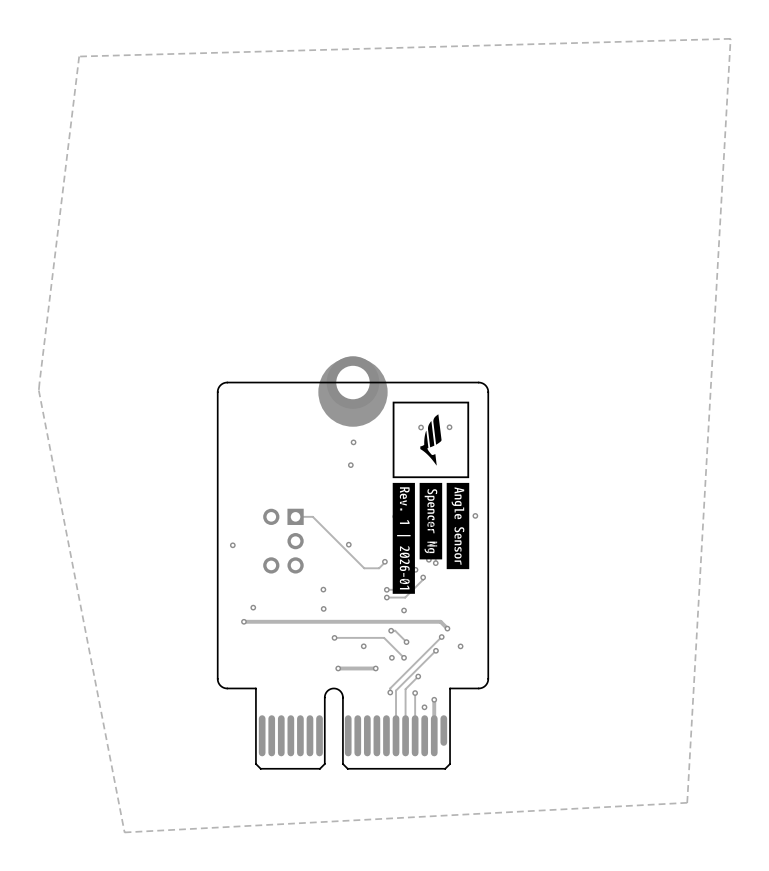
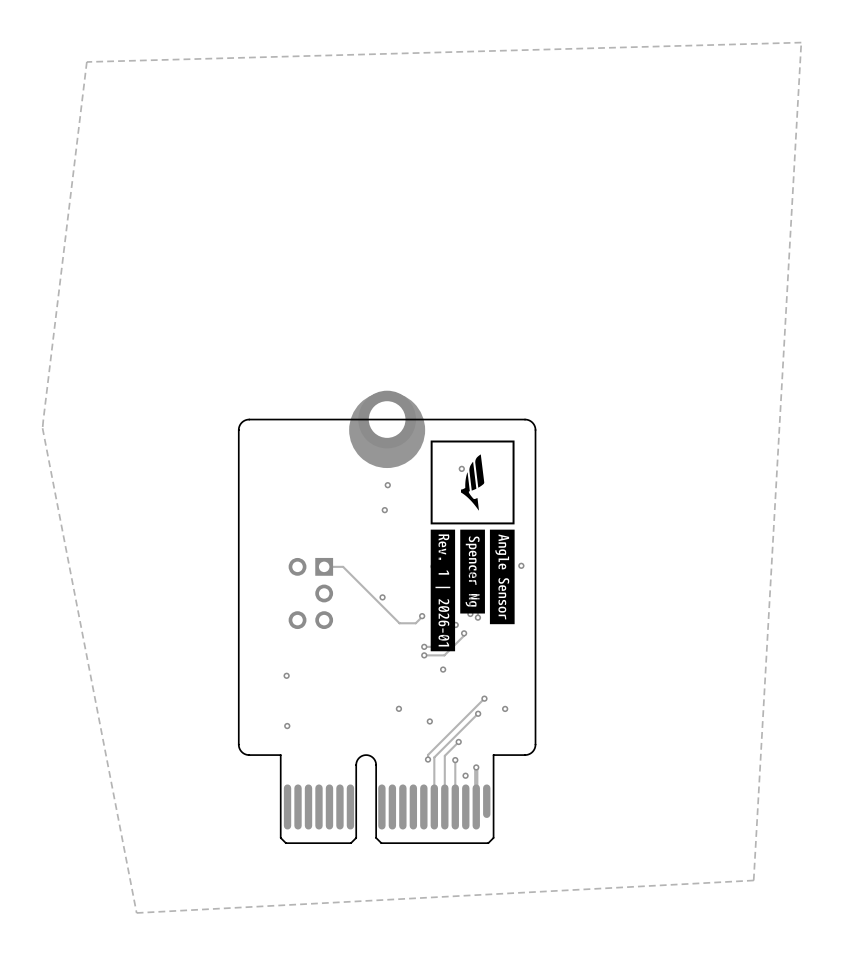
via: (449, 427) -> none
via: (232, 545) -> none
via: (323, 589) -> none
via: (253, 607) -> none
via: (323, 608) -> none
via: none -> (286, 675)
track: (243, 621) (440, 621) (447, 628) -> none
via: (243, 621) -> none
via: (447, 628) -> none
track: (391, 630) (395, 630) (406, 642) -> none
via: (391, 630) -> none
track: (334, 637) (384, 637) (404, 657) -> none
via: (334, 637) -> none
via: (406, 642) -> none
via: (404, 657) -> none
via: none -> (287, 726)
via: (338, 668) -> none
track: (375, 668) (338, 668) -> none
via: (375, 668) -> none

